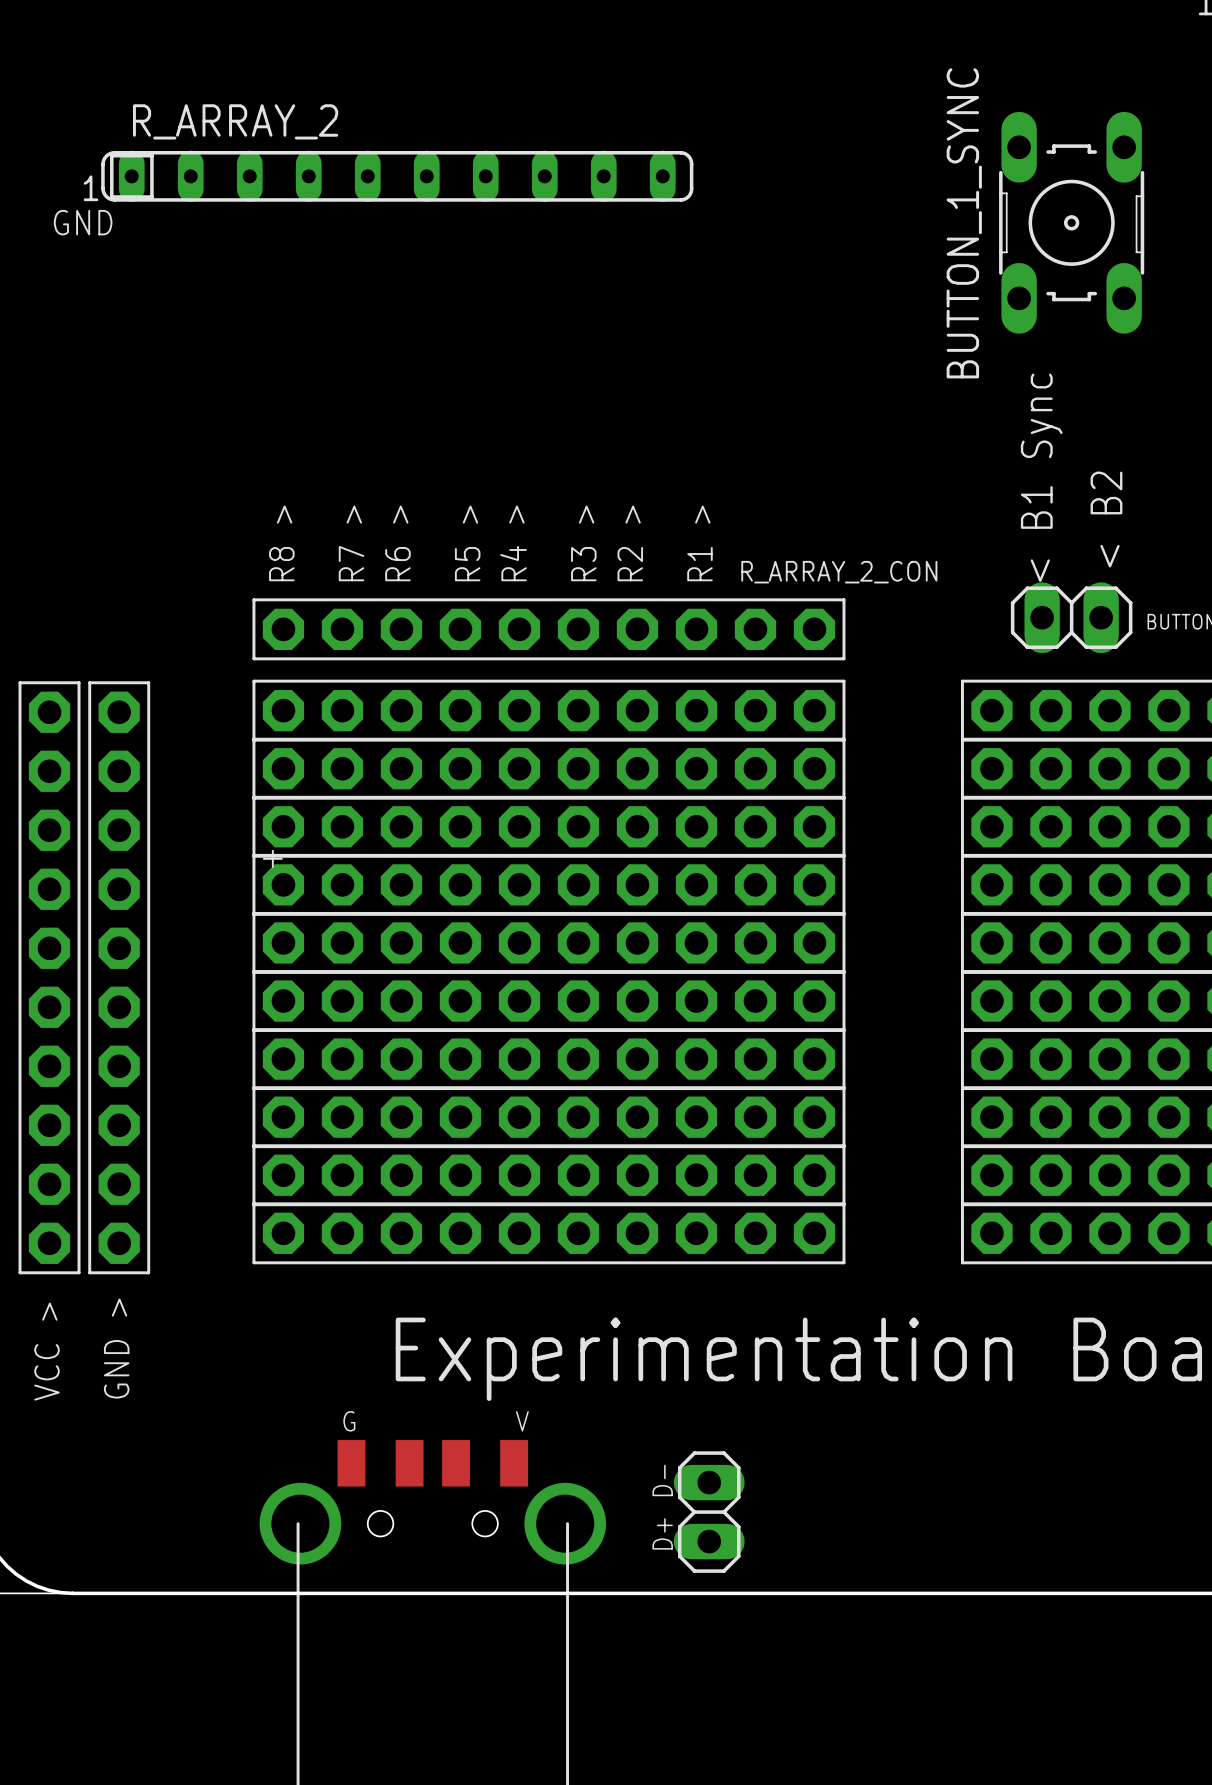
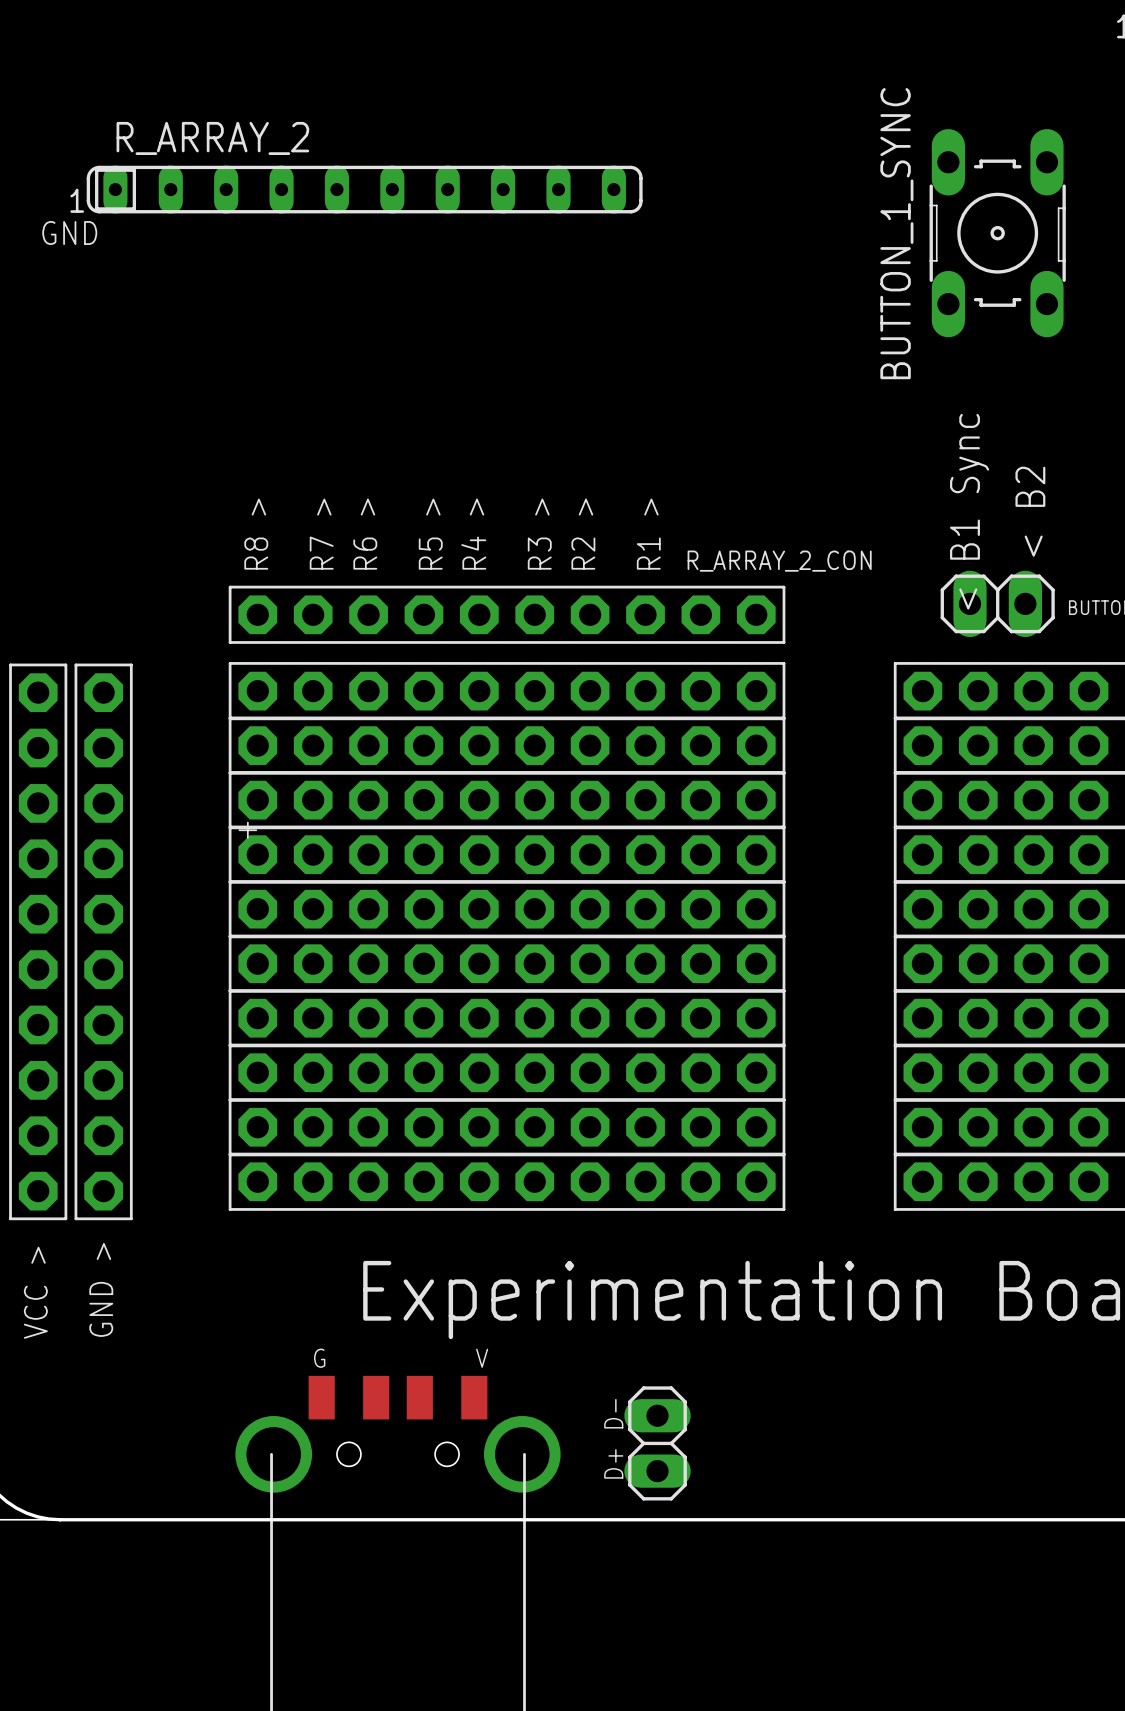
text position: < B1 Sync (1041, 477) -> < B1 Sync (969, 511)

